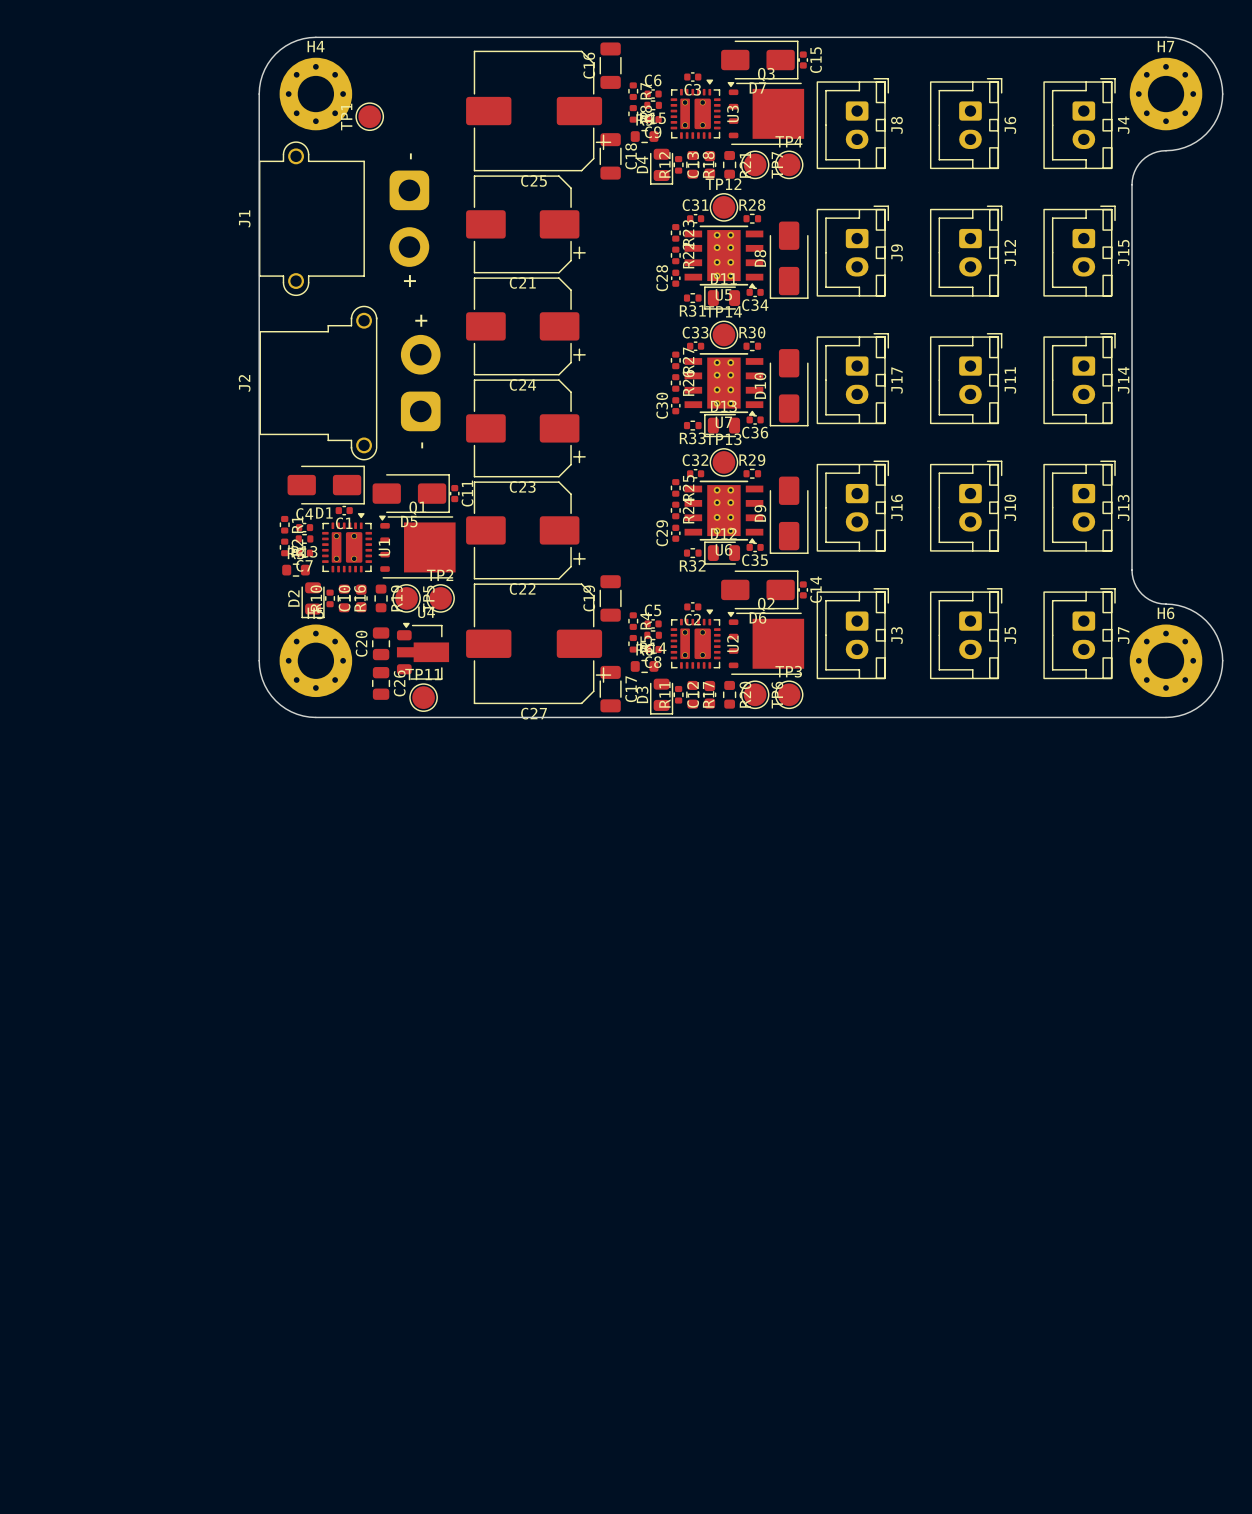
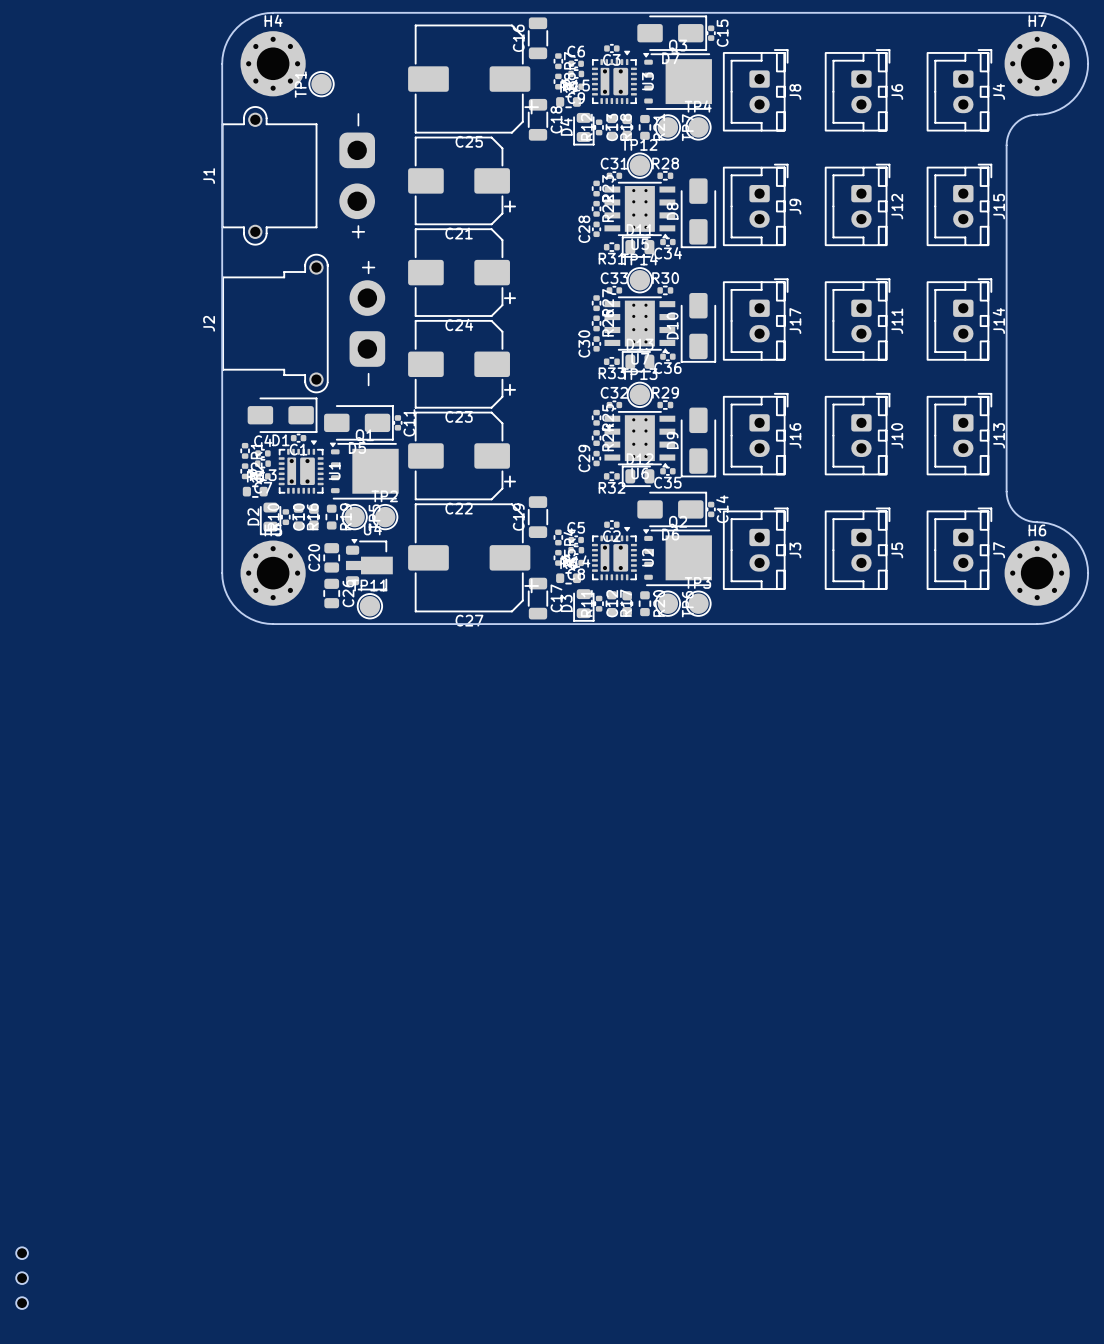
part: none -> (22, 1253)
part: none -> (22, 1278)
part: none -> (22, 1303)

